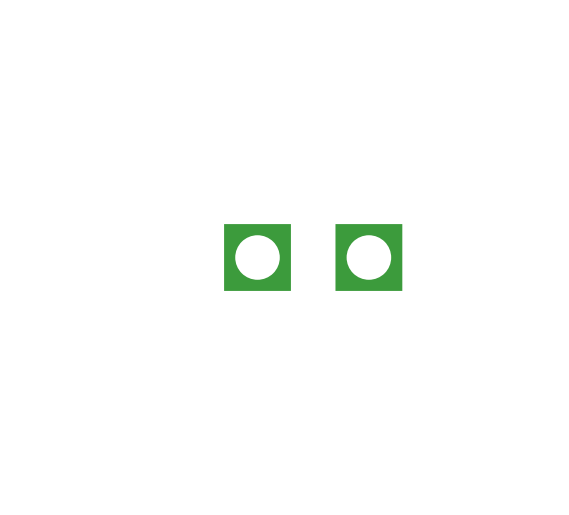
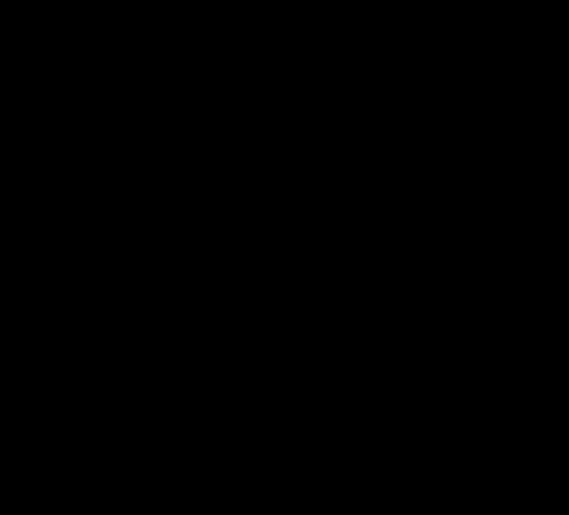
part: (313, 257) -> none

